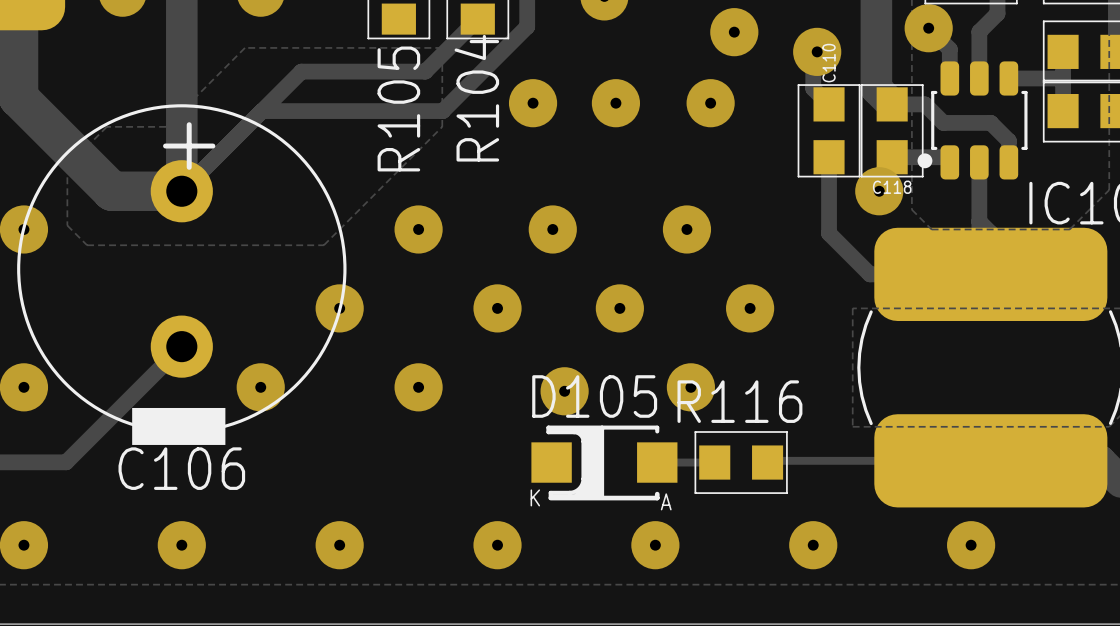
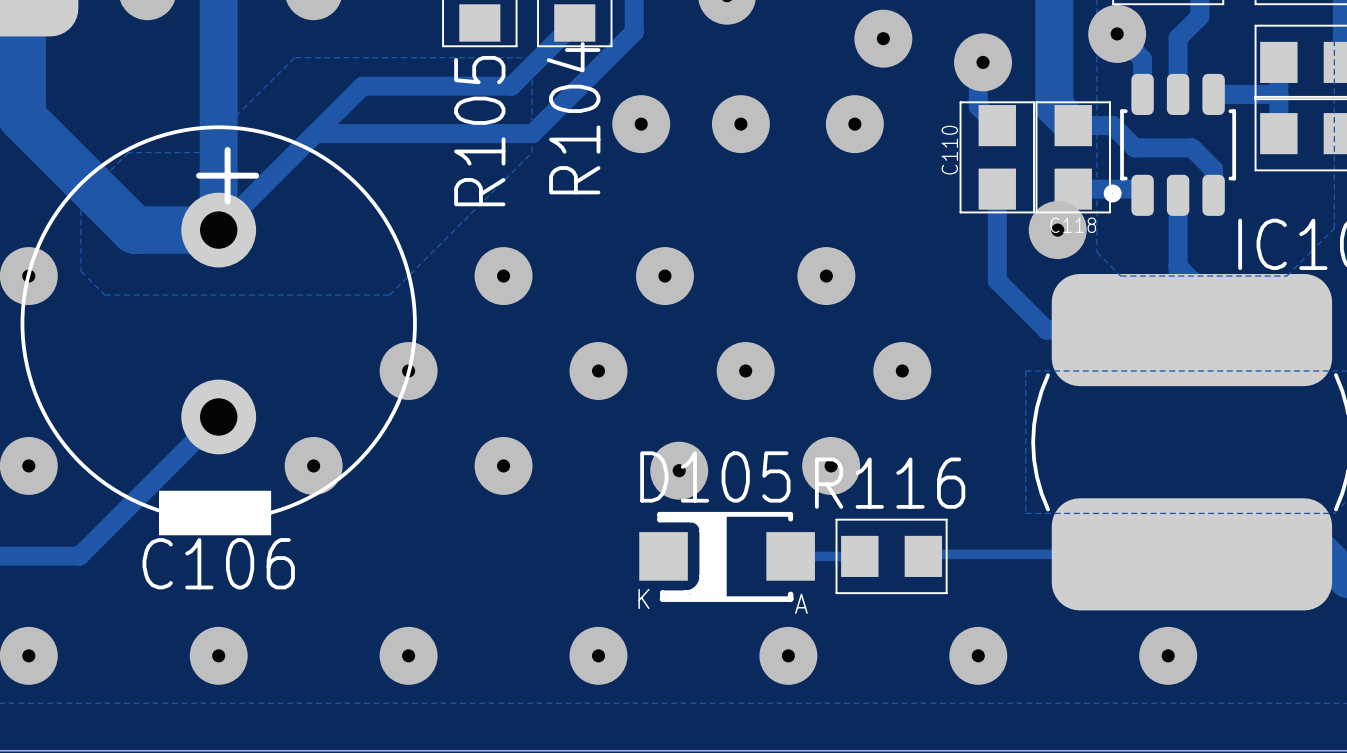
C110 name position: C110 (829, 63) -> C110 (949, 150)

